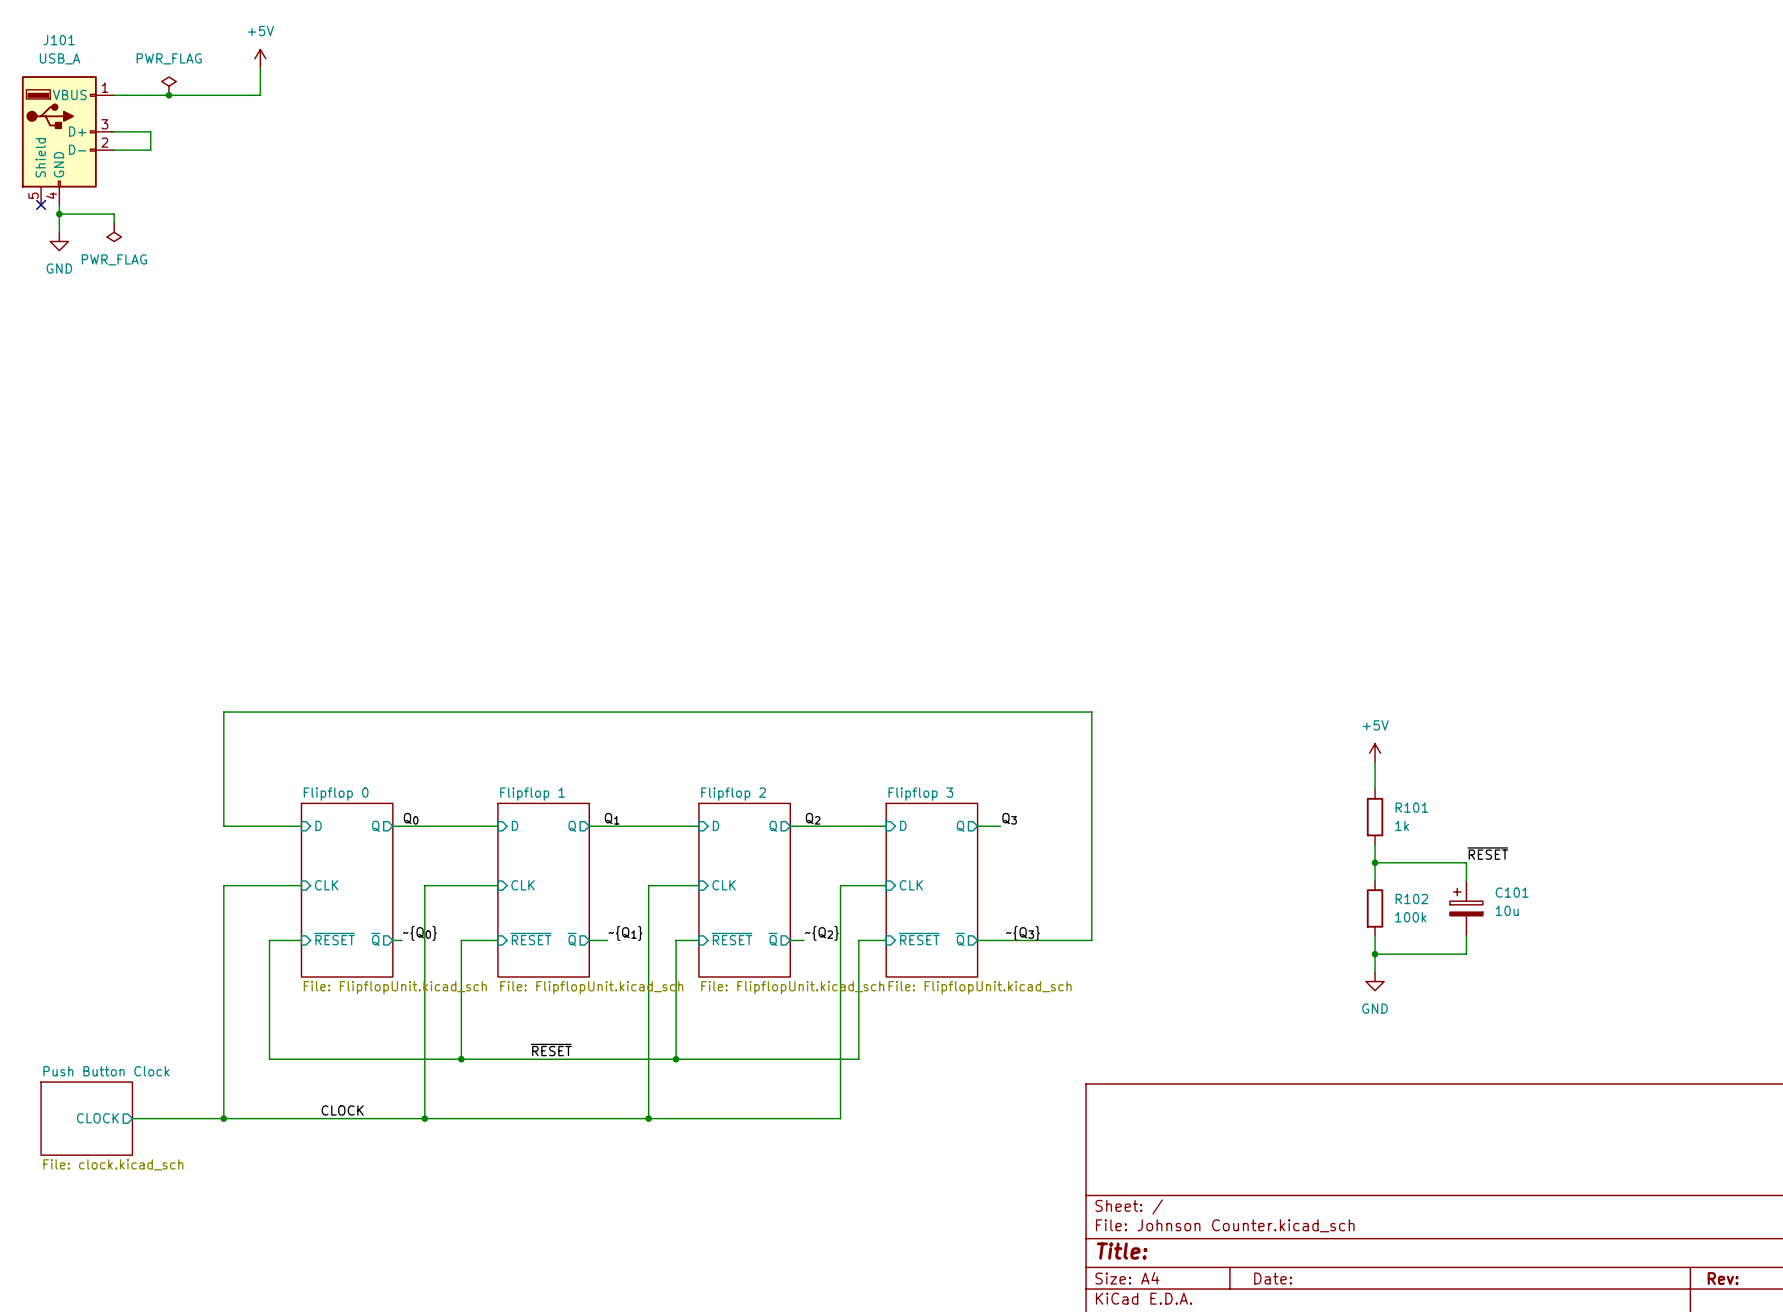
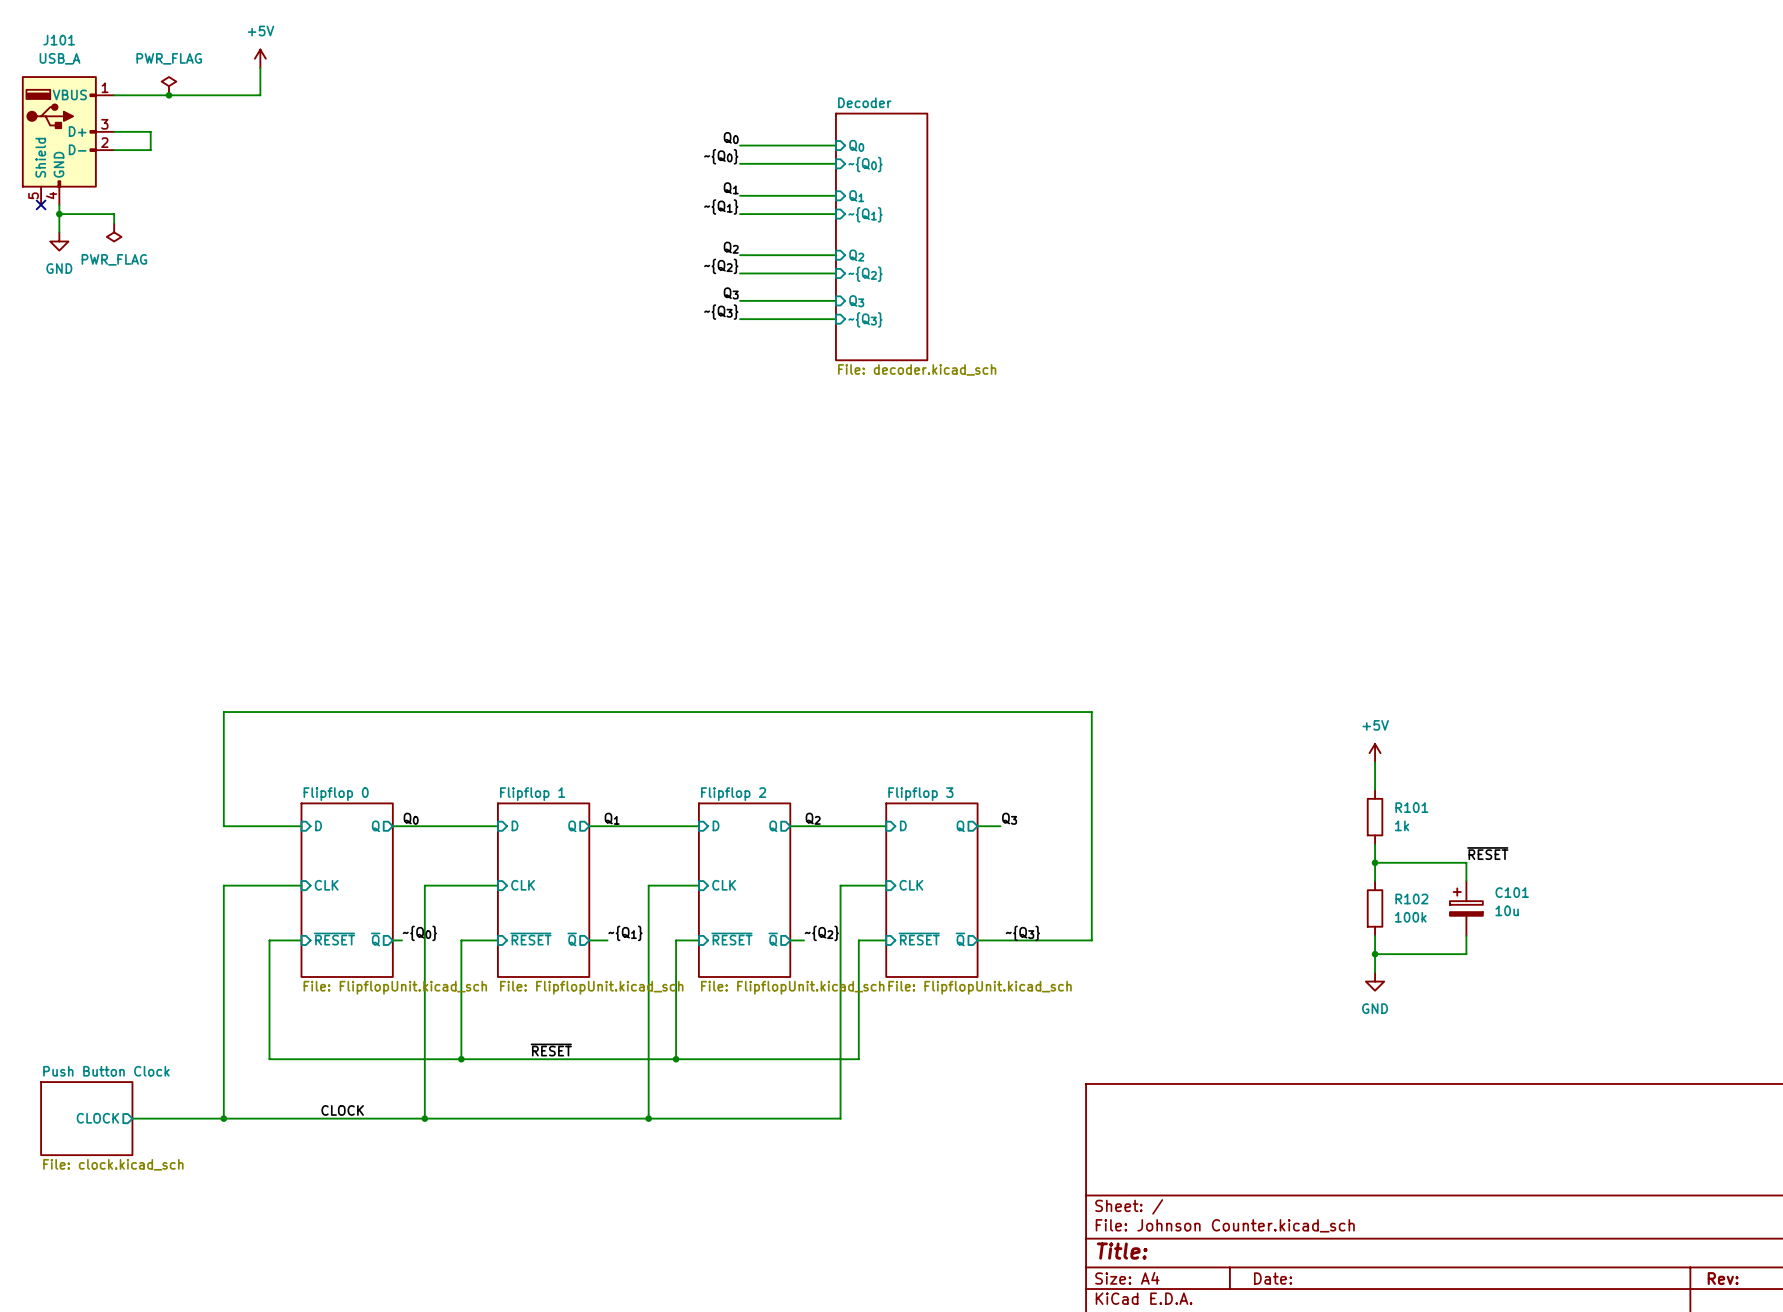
label: none -> Q0 (731, 138)
wire: none -> (740, 145) (835, 145)
sheet pin: none -> Q0 (856, 145)
label: none -> ~{Q0} (721, 156)
wire: none -> (740, 163) (835, 163)
sheet pin: none -> ~{Q0} (865, 164)
label: none -> Q1 (731, 188)
wire: none -> (740, 195) (835, 195)
sheet pin: none -> Q1 (856, 196)
label: none -> ~{Q1} (721, 207)
wire: none -> (740, 214) (835, 214)
sheet pin: none -> ~{Q1} (865, 214)
sheet Decoder: none -> File: decoder.kicad_sch (881, 236)
label: none -> Q2 (731, 247)
wire: none -> (740, 255) (835, 255)
sheet pin: none -> Q2 (856, 255)
label: none -> ~{Q2} (721, 266)
wire: none -> (740, 273) (835, 273)
sheet pin: none -> ~{Q2} (865, 274)
label: none -> Q3 (731, 293)
wire: none -> (740, 300) (835, 300)
sheet pin: none -> Q3 (856, 301)
label: none -> ~{Q3} (721, 312)
wire: none -> (740, 319) (835, 319)
sheet pin: none -> ~{Q3} (865, 319)

